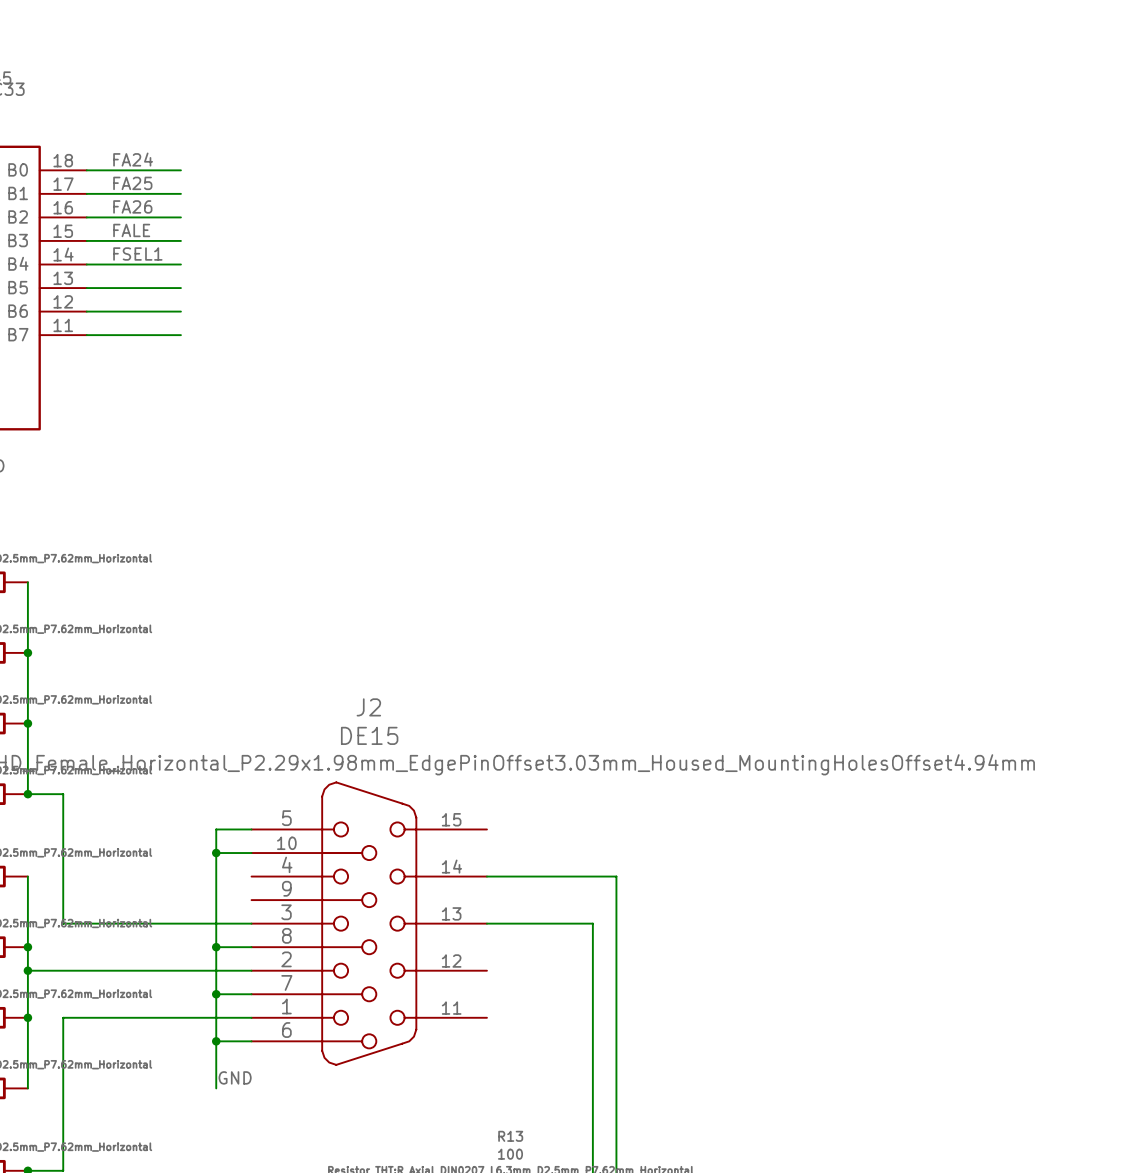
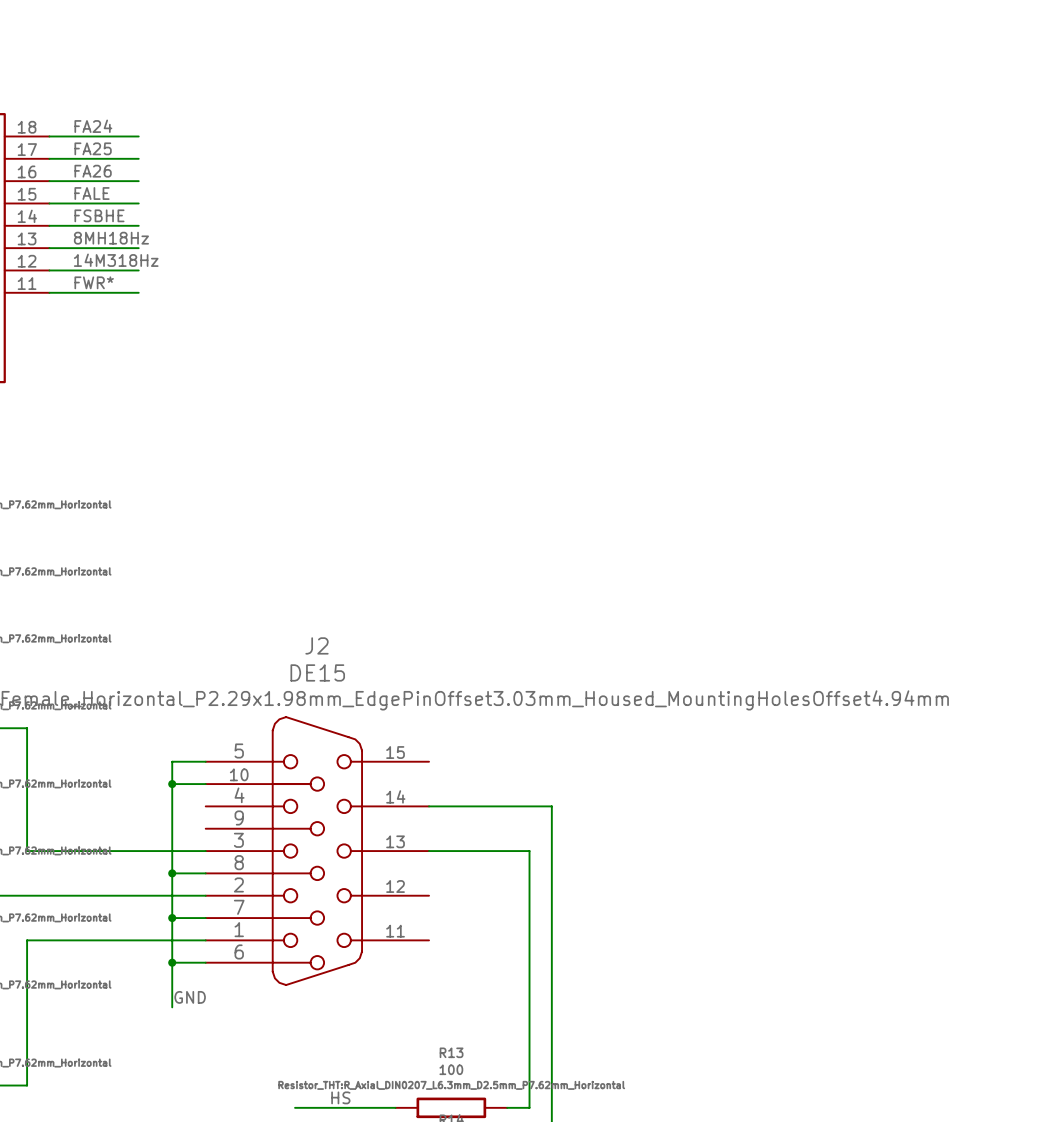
label: FSEL1 (137, 254) -> FSBHE (99, 215)
label: none -> 8MH18Hz (111, 238)
label: none -> 14M318Hz (116, 260)
label: none -> FWR* (94, 282)

